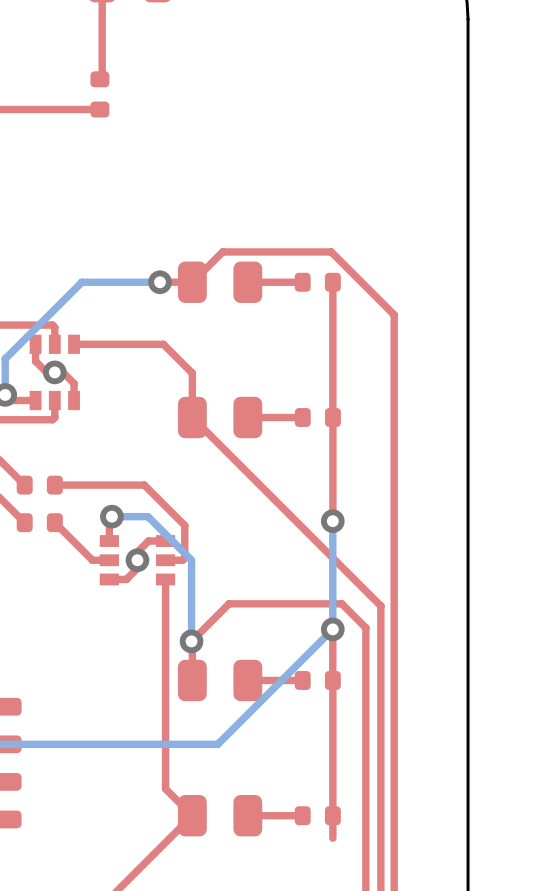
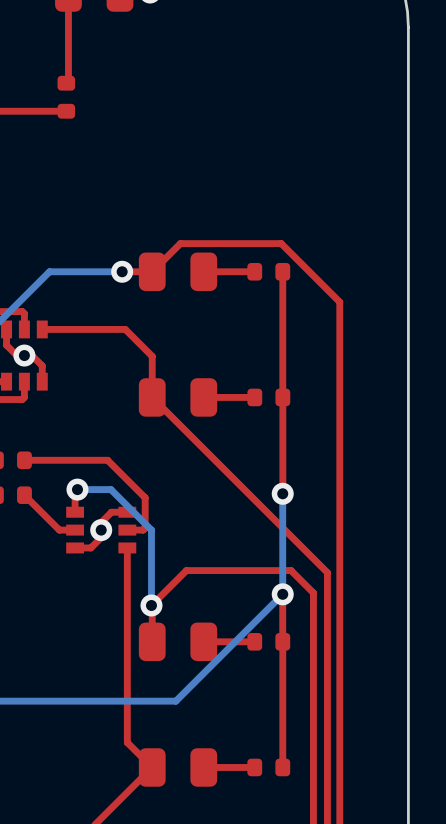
top track: (332, 815) (332, 838) -> none

